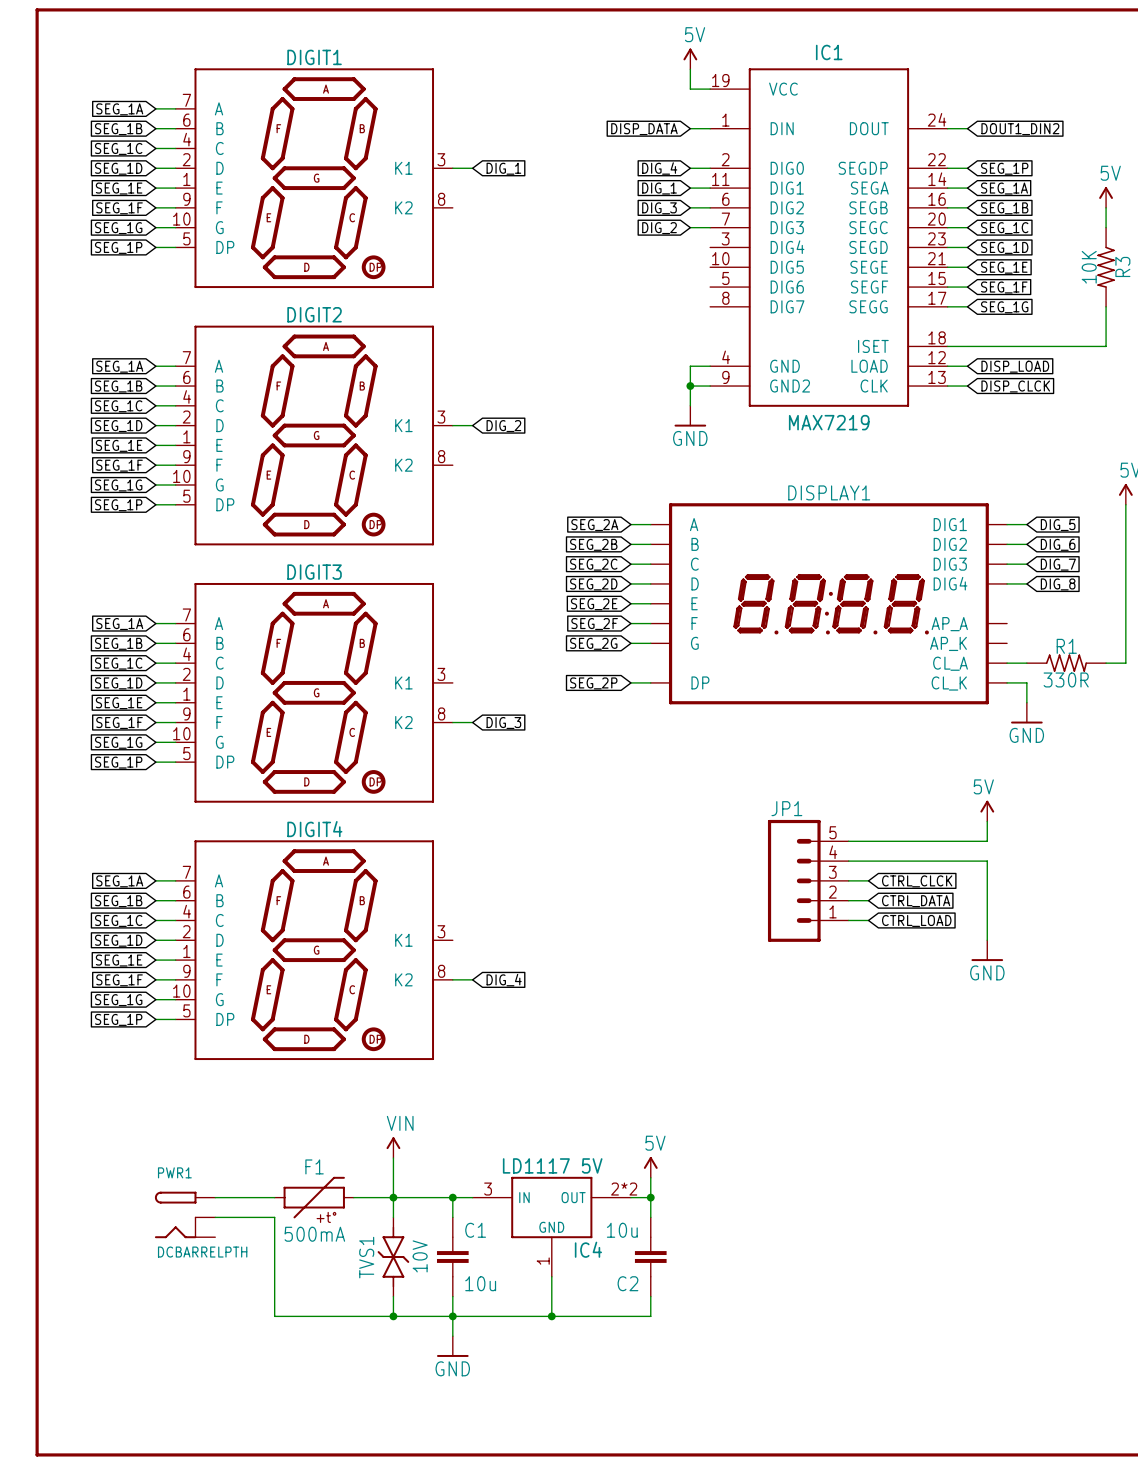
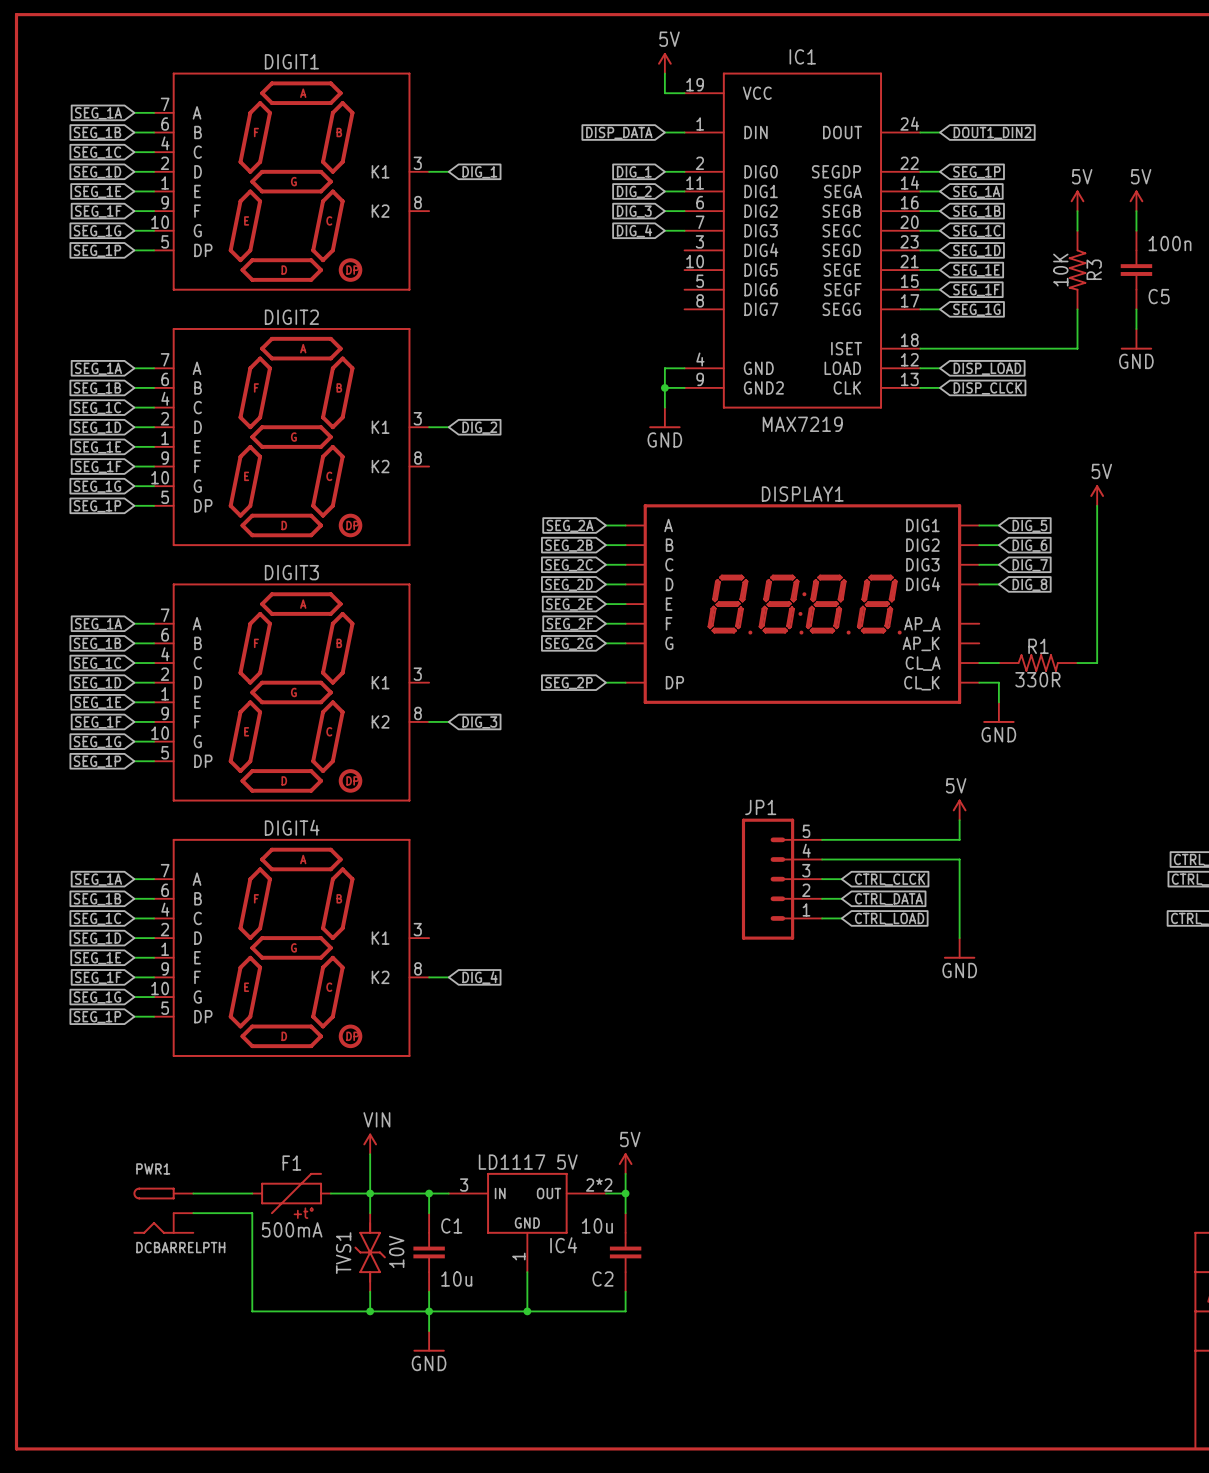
global label: DIG_4 (659, 168) -> DIG_1 (634, 172)
global label: DIG_1 (659, 188) -> DIG_2 (634, 191)
global label: DIG_2 (659, 228) -> DIG_4 (634, 230)

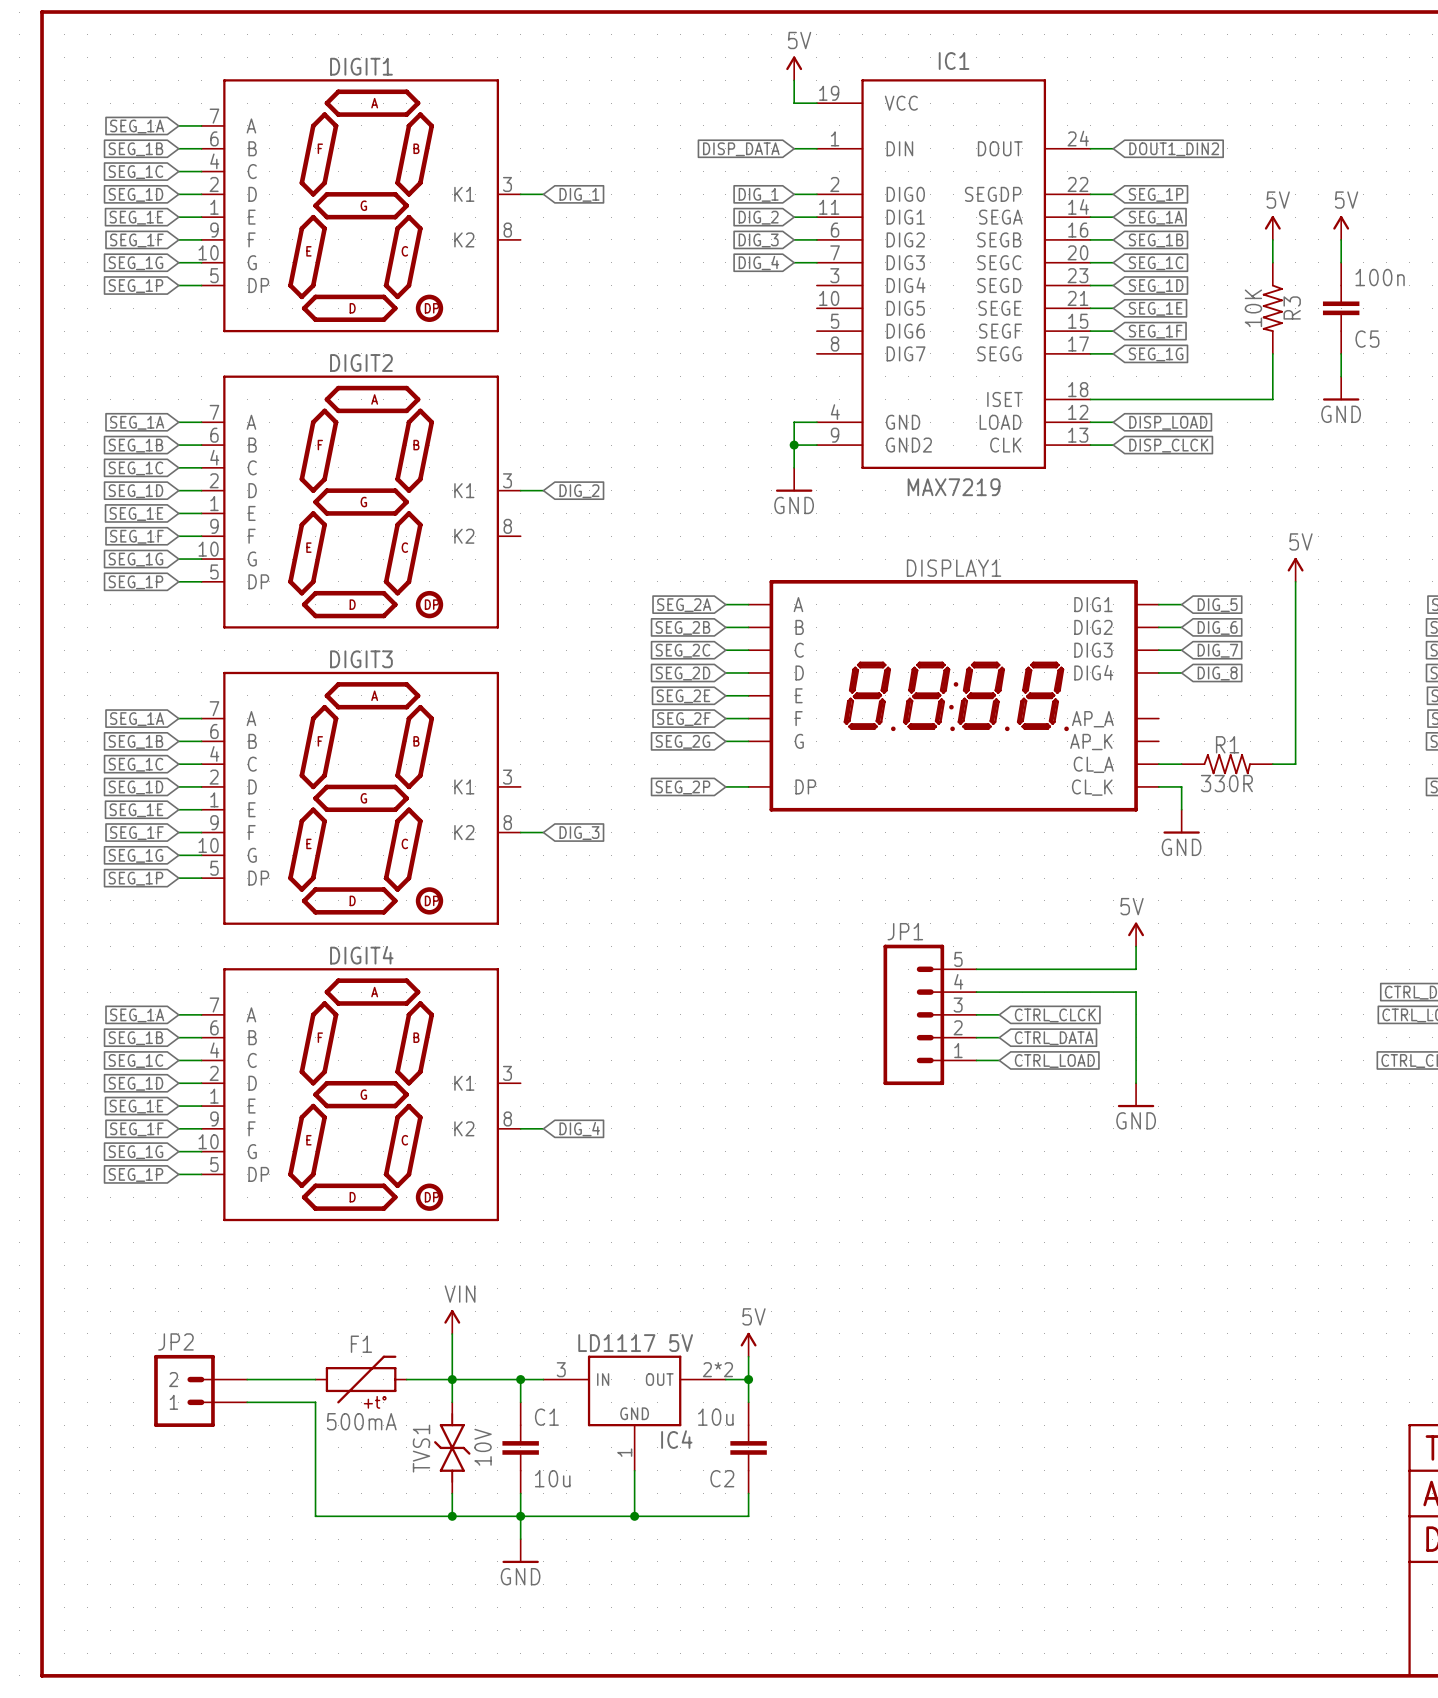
JP2: none -> (200, 1390)
PWR1: DCBARRELPTH (163, 1210) -> none

